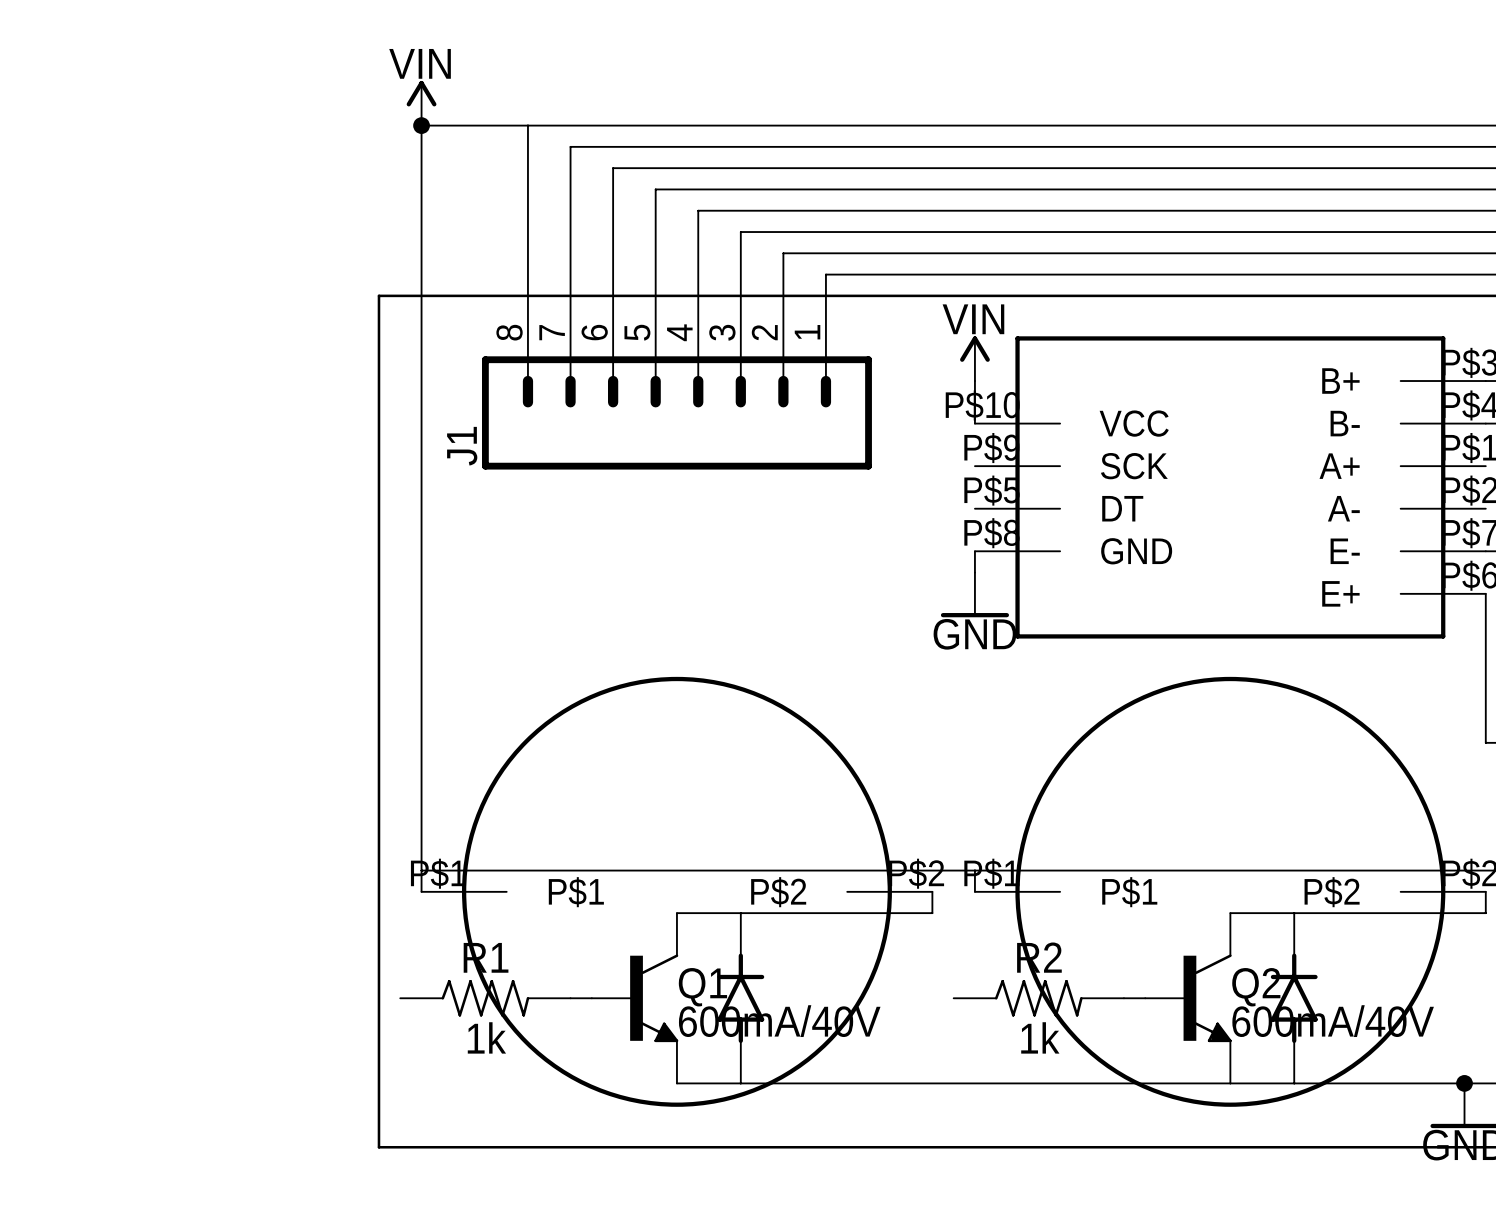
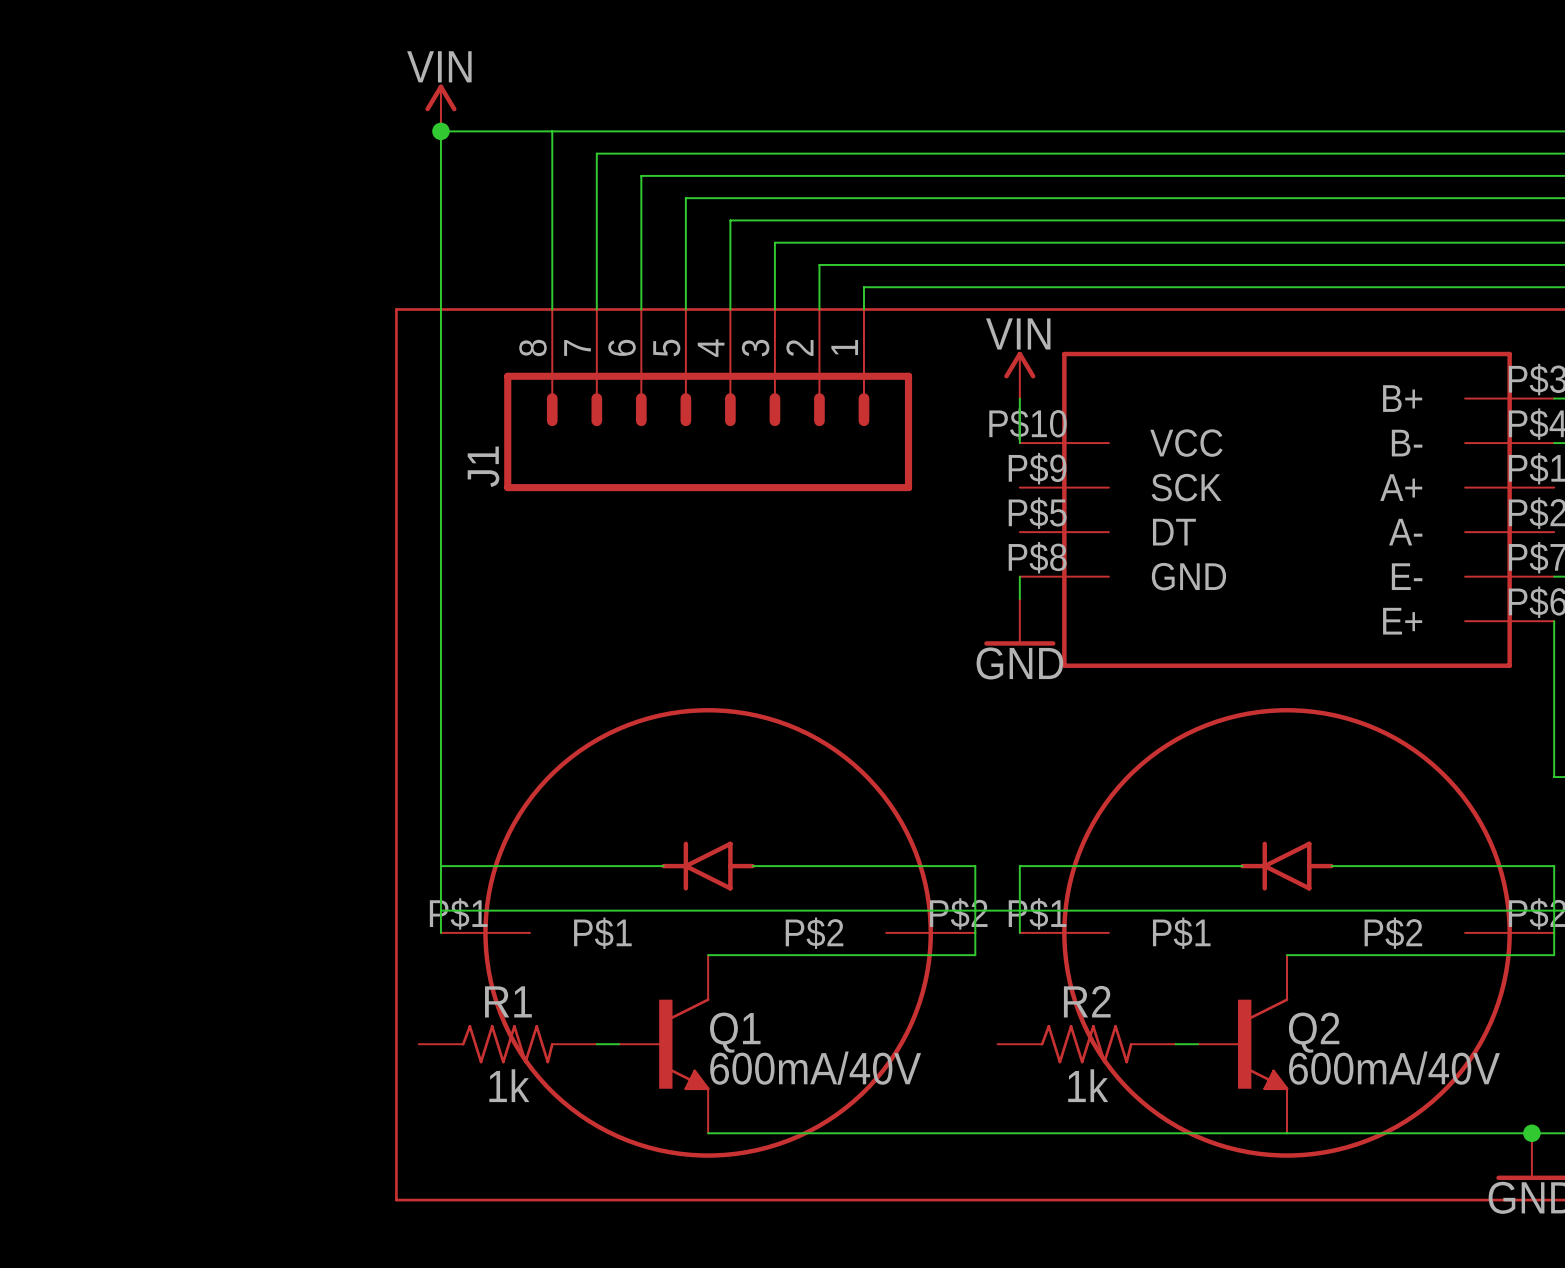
wire: none -> (440, 866) (663, 866)
wire: none -> (752, 866) (975, 866) (975, 932)
wire: none -> (1242, 866) (1019, 866) (1019, 910)
wire: none -> (1331, 866) (1554, 866) (1554, 932)
wire: (740, 913) (740, 955) -> none
wire: (1294, 913) (1294, 955) -> none
part rotation: 0° (740, 998) -> 90° counterclockwise (708, 866)
part position: (740, 998) -> (708, 866)
part rotation: 0° (1294, 998) -> 90° counterclockwise (1287, 866)
part position: (1294, 998) -> (1287, 866)
wire: (740, 1040) (740, 1083) -> none
wire: (1294, 1040) (1294, 1083) -> none

